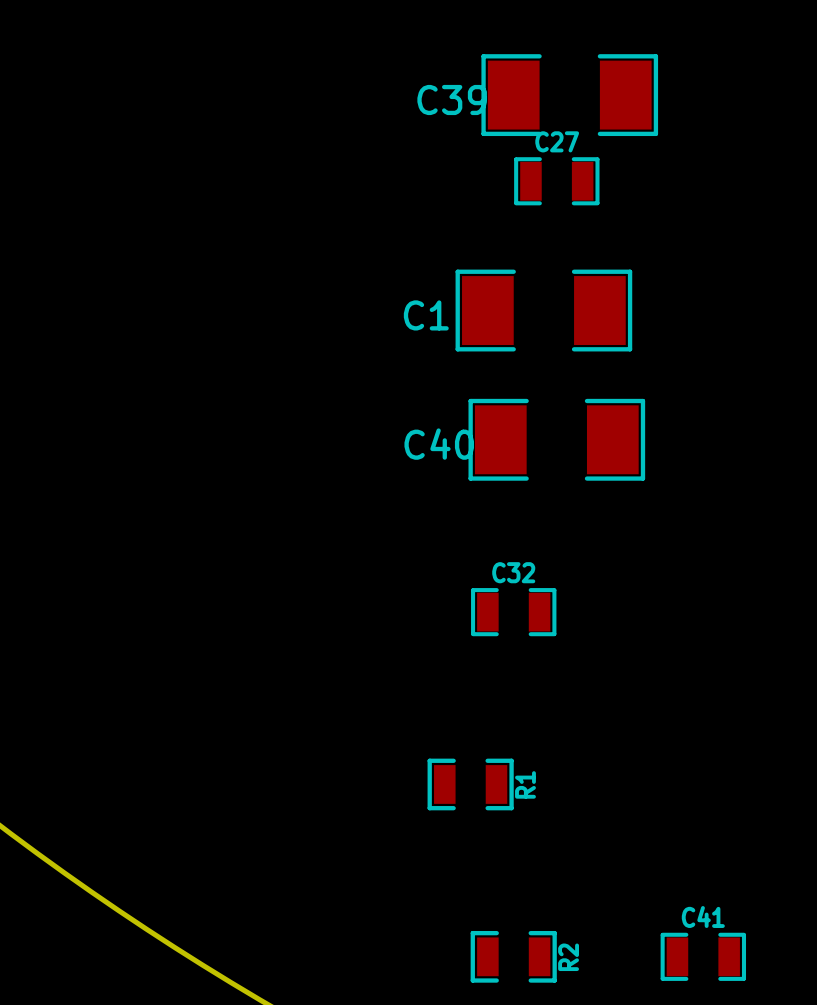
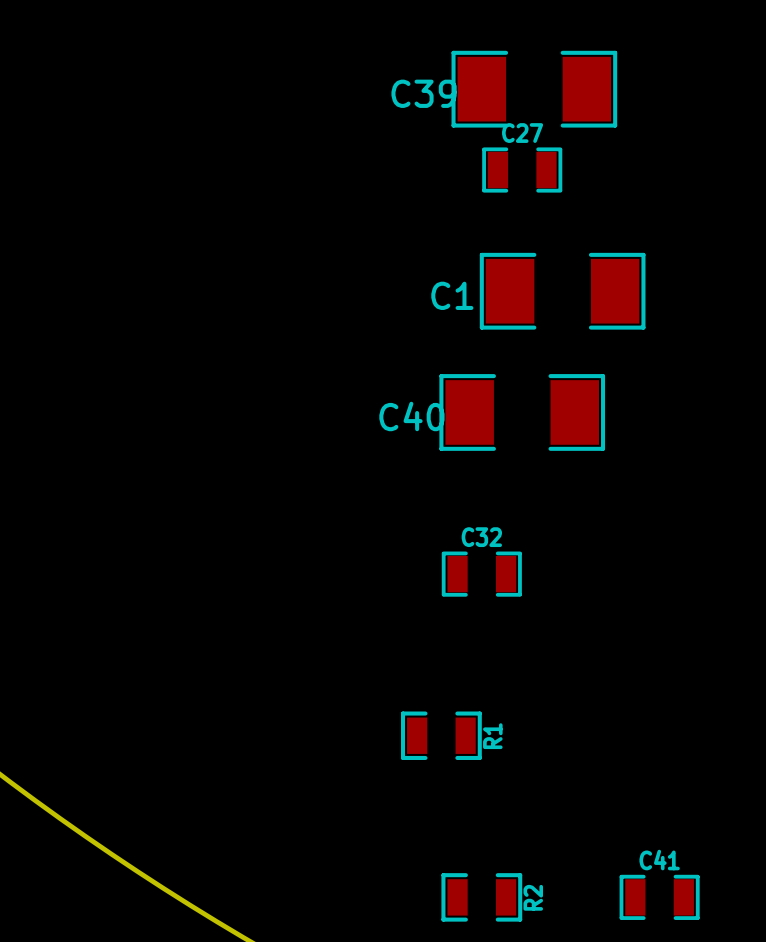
C1 position: (543, 310) -> (562, 291)

